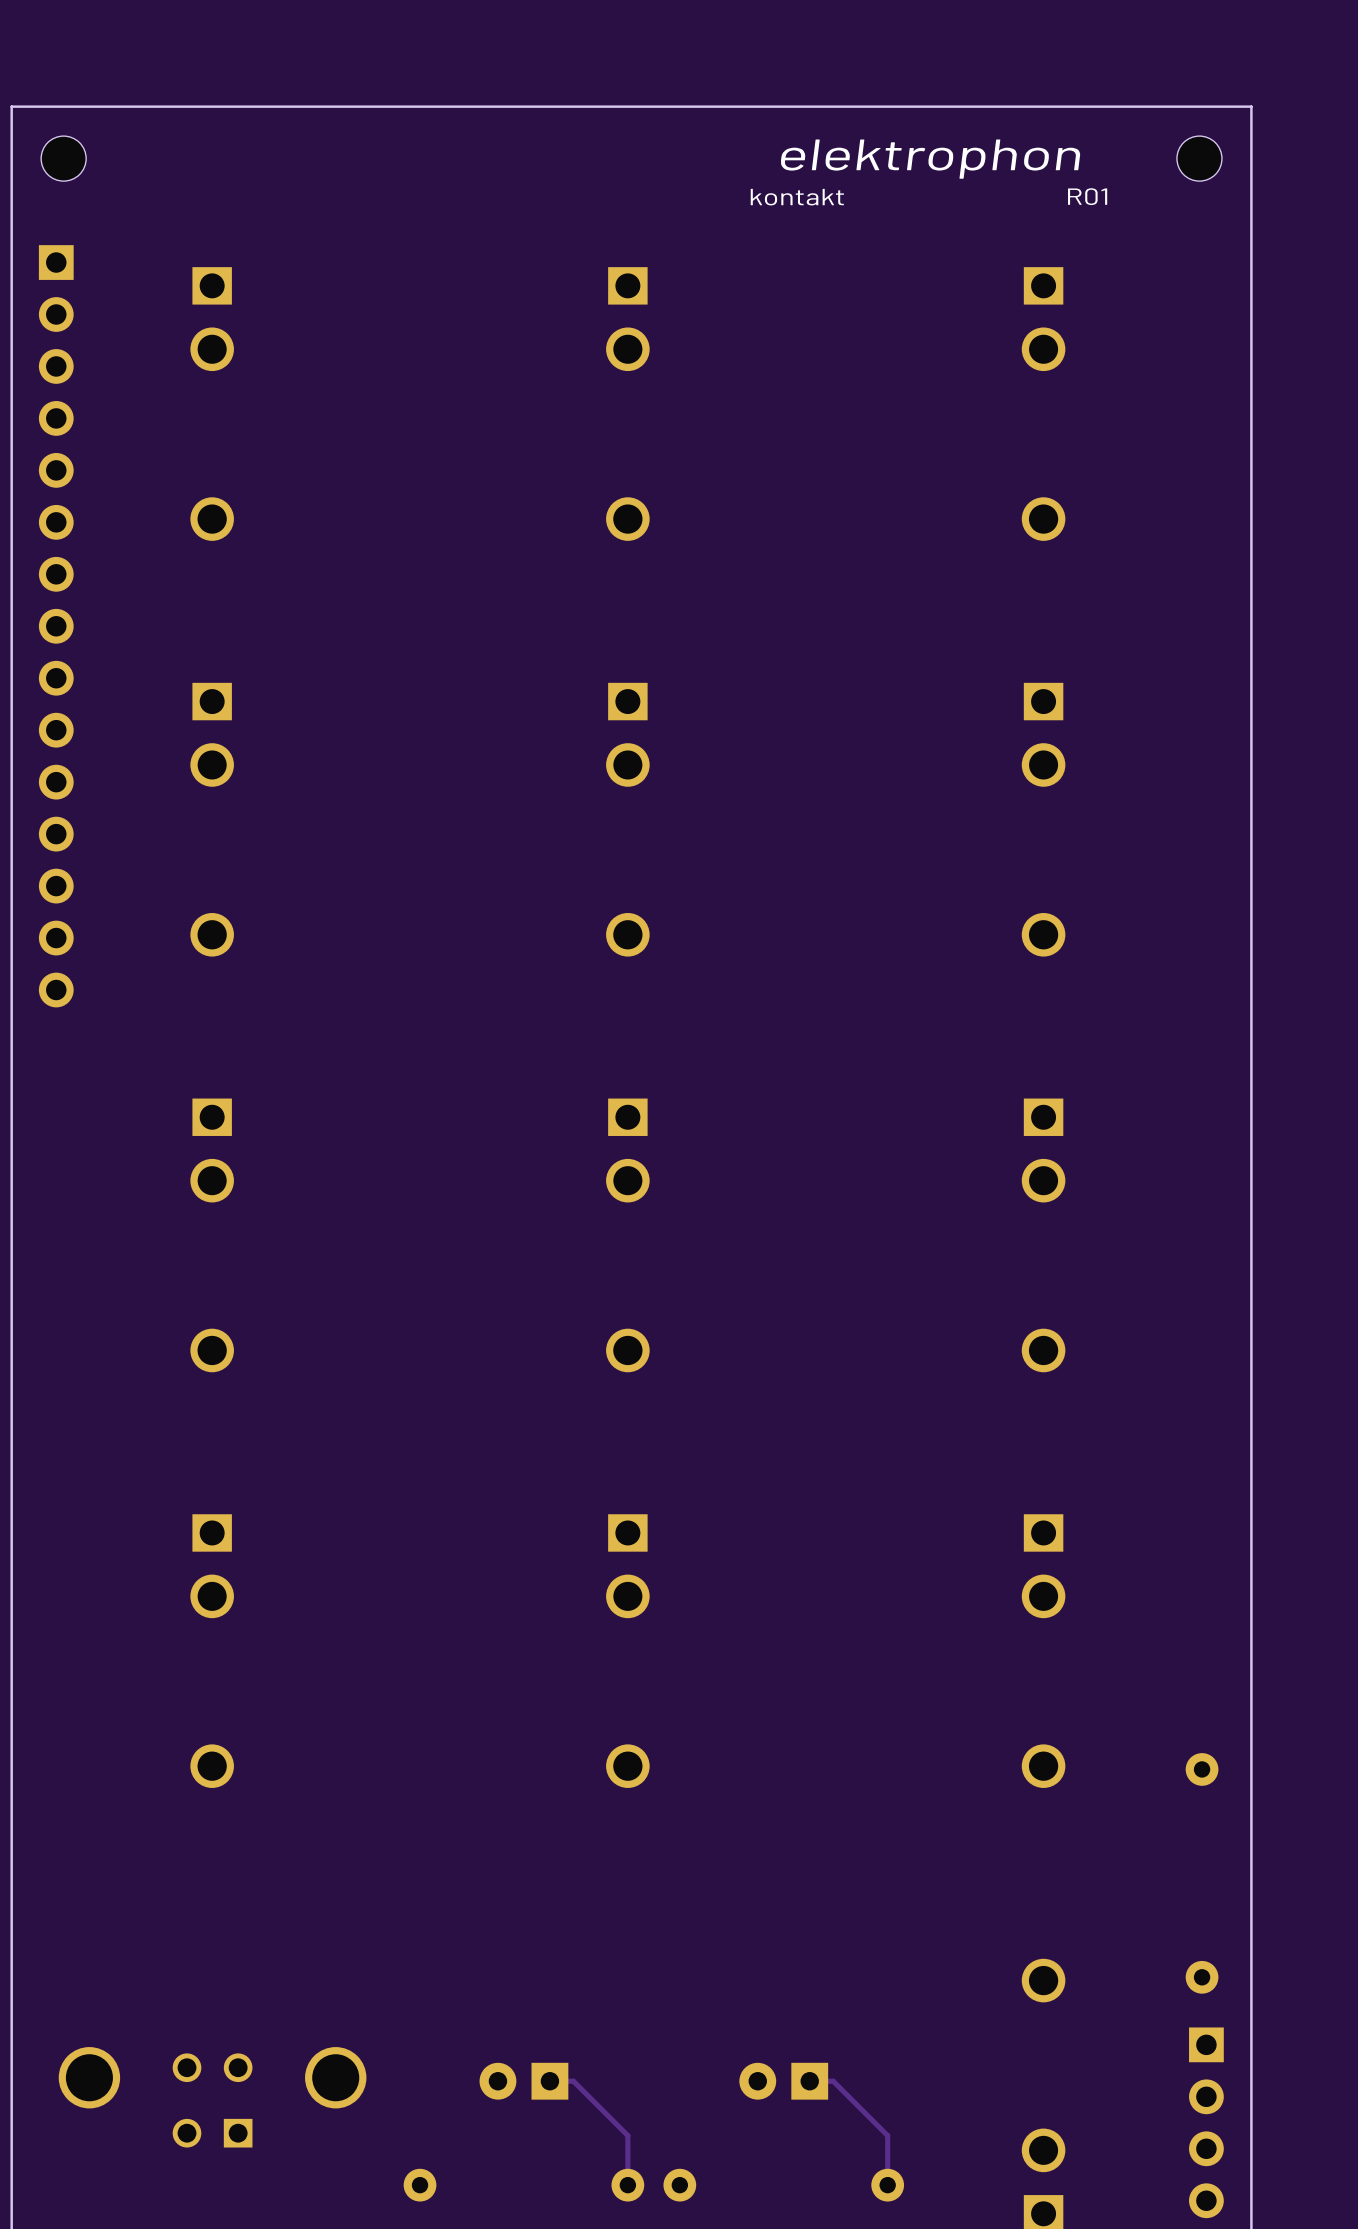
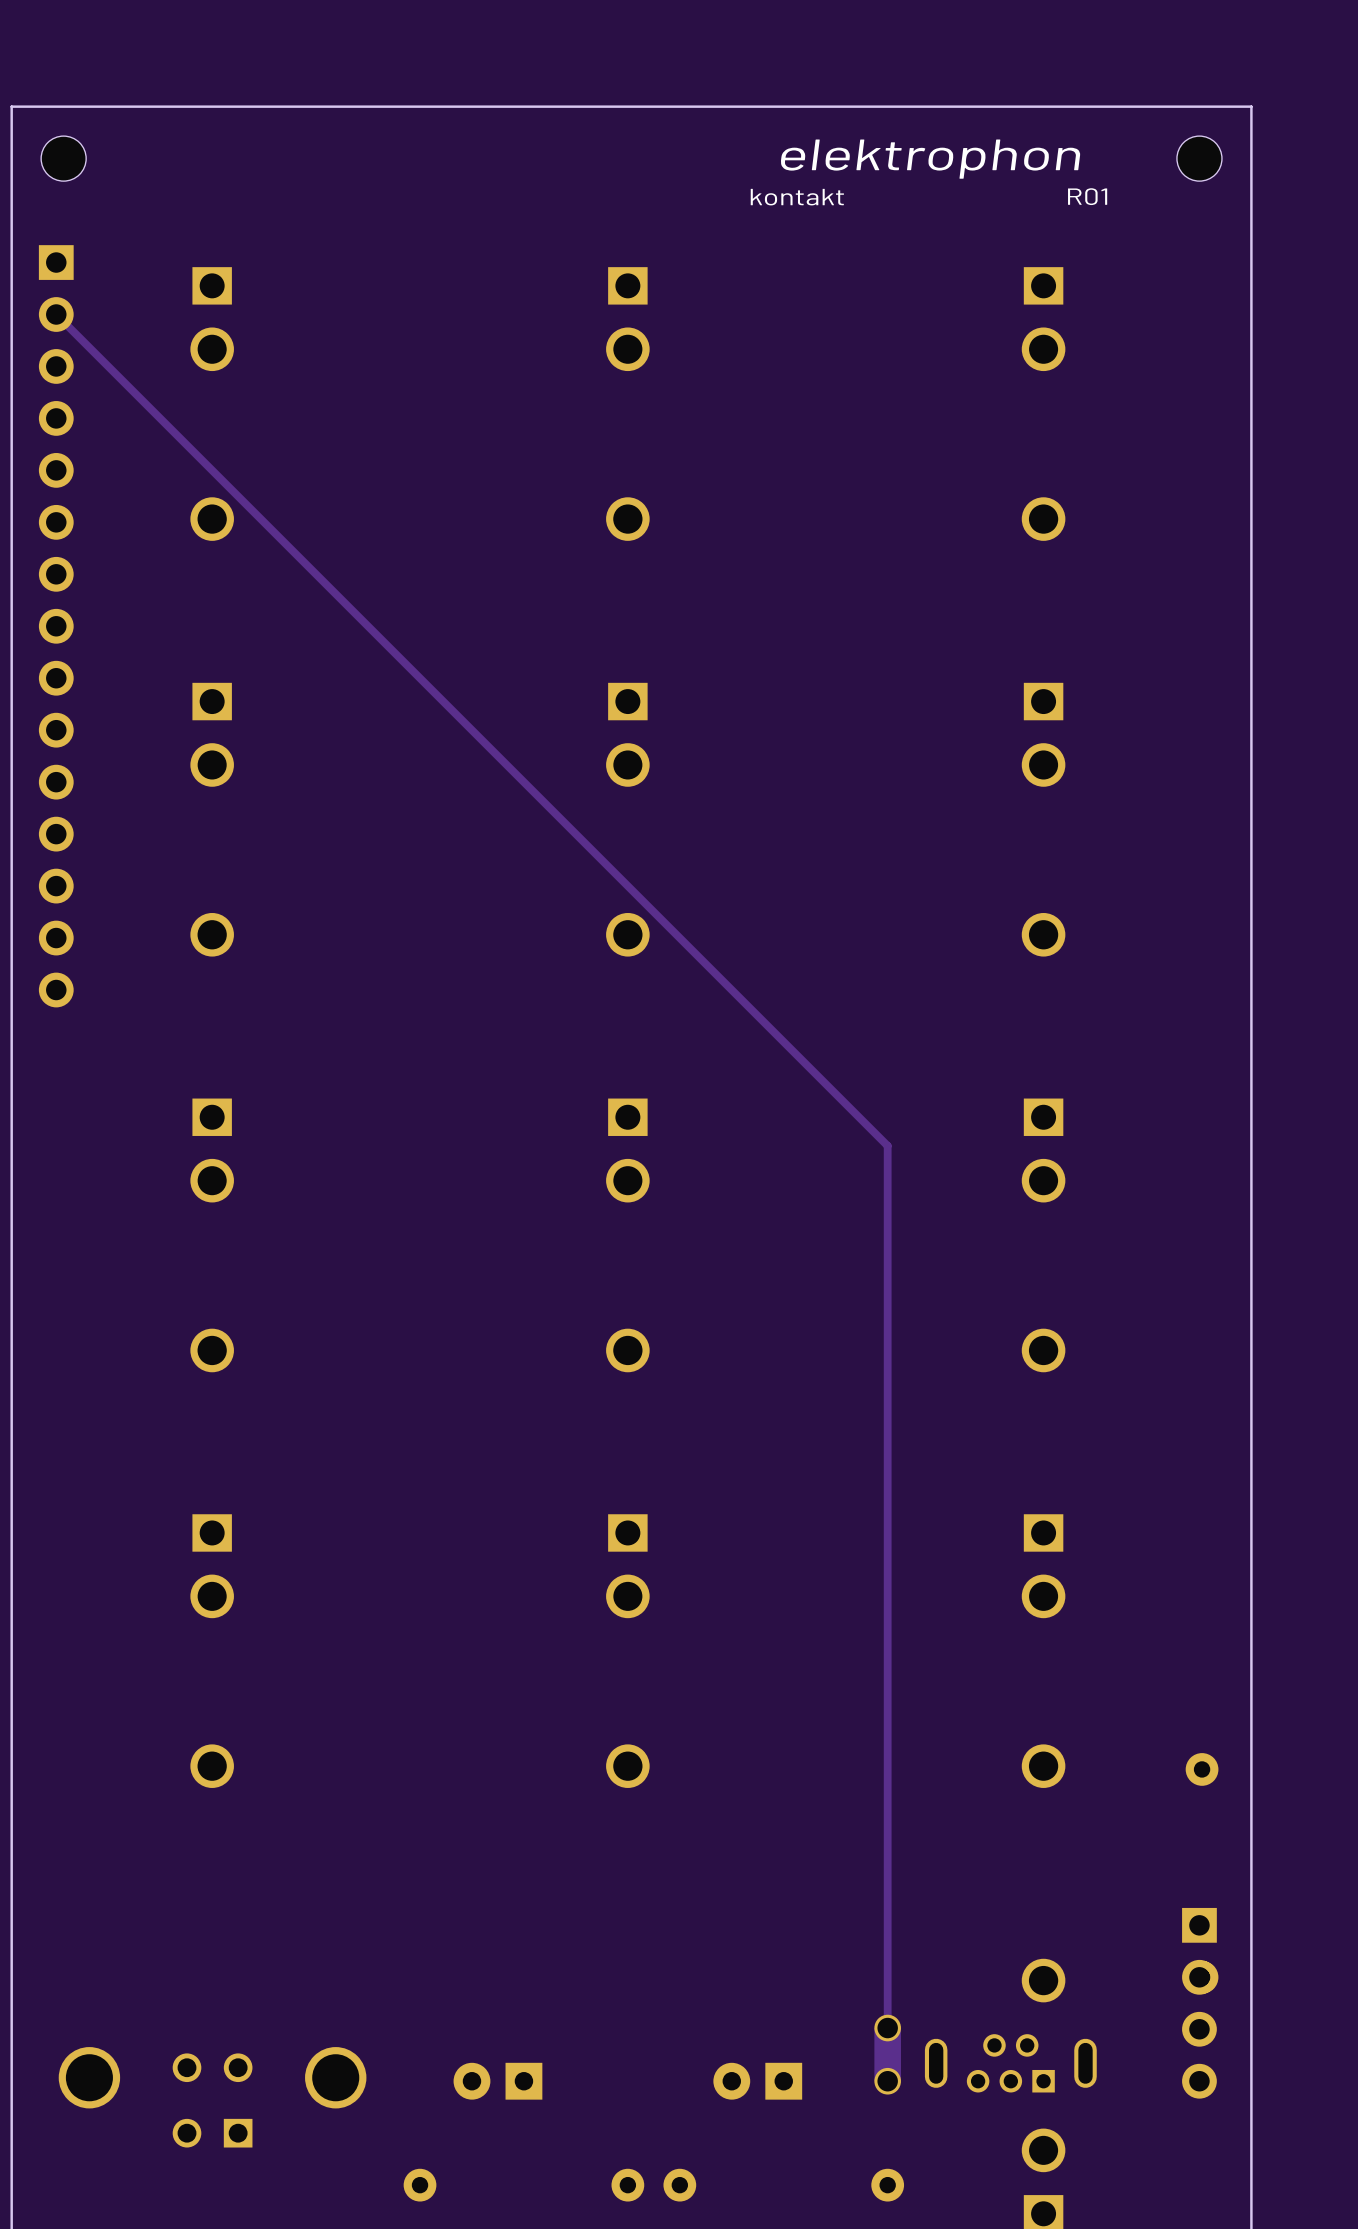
track: none -> (56, 314) (887, 1145) (887, 2028)
part: none -> (887, 2054)
part: none -> (1010, 2063)
part position: (523, 2081) -> (497, 2081)
track: (549, 2081) (573, 2081) (627, 2135) (627, 2185) -> none
part position: (783, 2081) -> (757, 2081)
track: (809, 2081) (833, 2081) (887, 2135) (887, 2185) -> none
part position: (1206, 2122) -> (1199, 2003)

